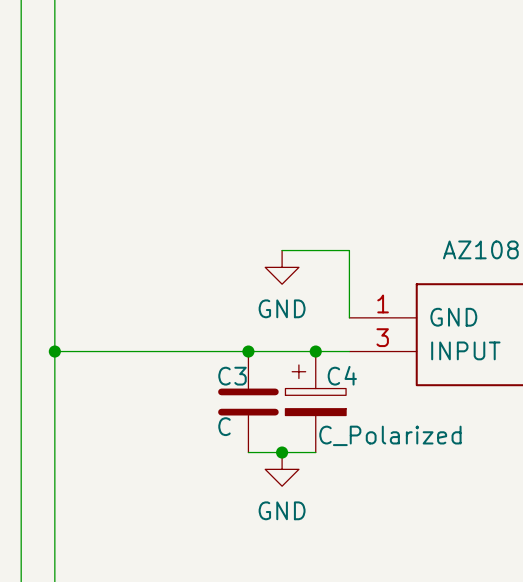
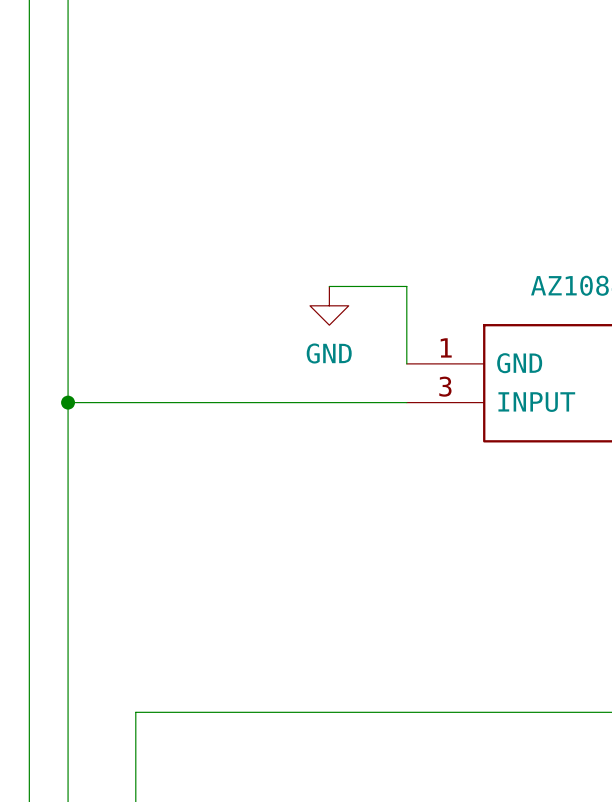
junction: (248, 351) -> none
junction: (315, 351) -> none
C3: C (248, 402) -> none
C4: C_Polarized (315, 402) -> none
wire: (248, 452) (315, 452) -> none
junction: (282, 452) -> none
power symbol: GND (282, 469) -> none

